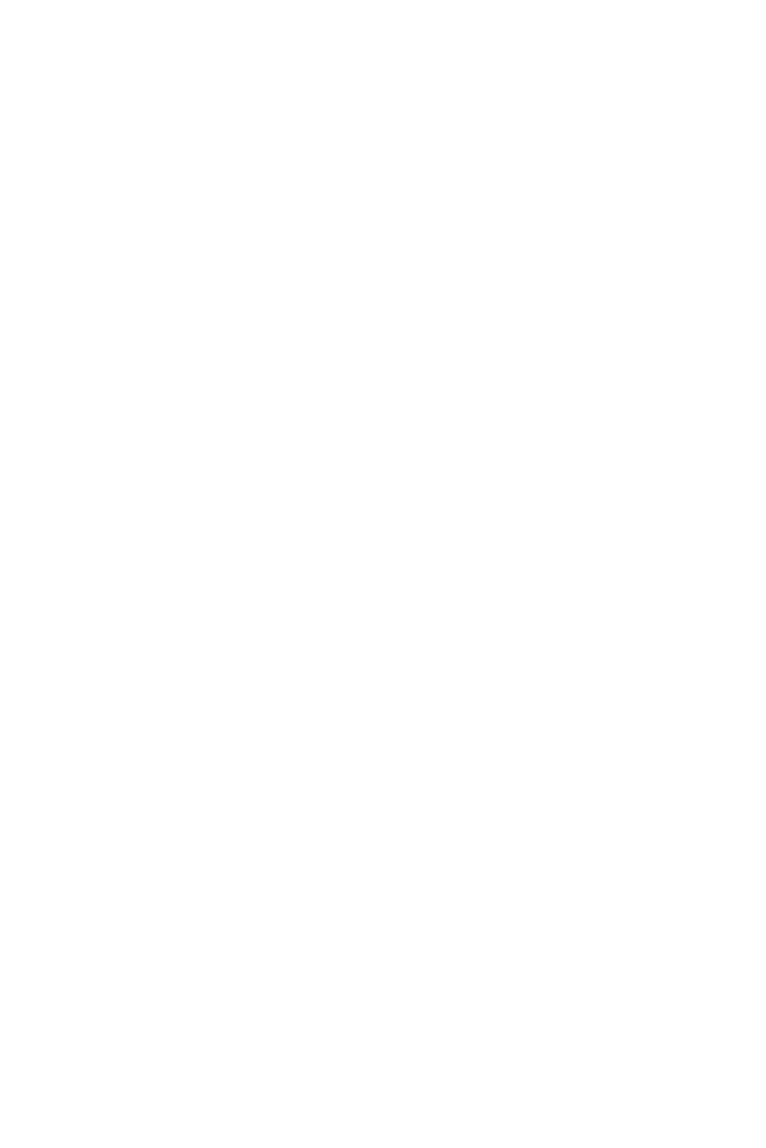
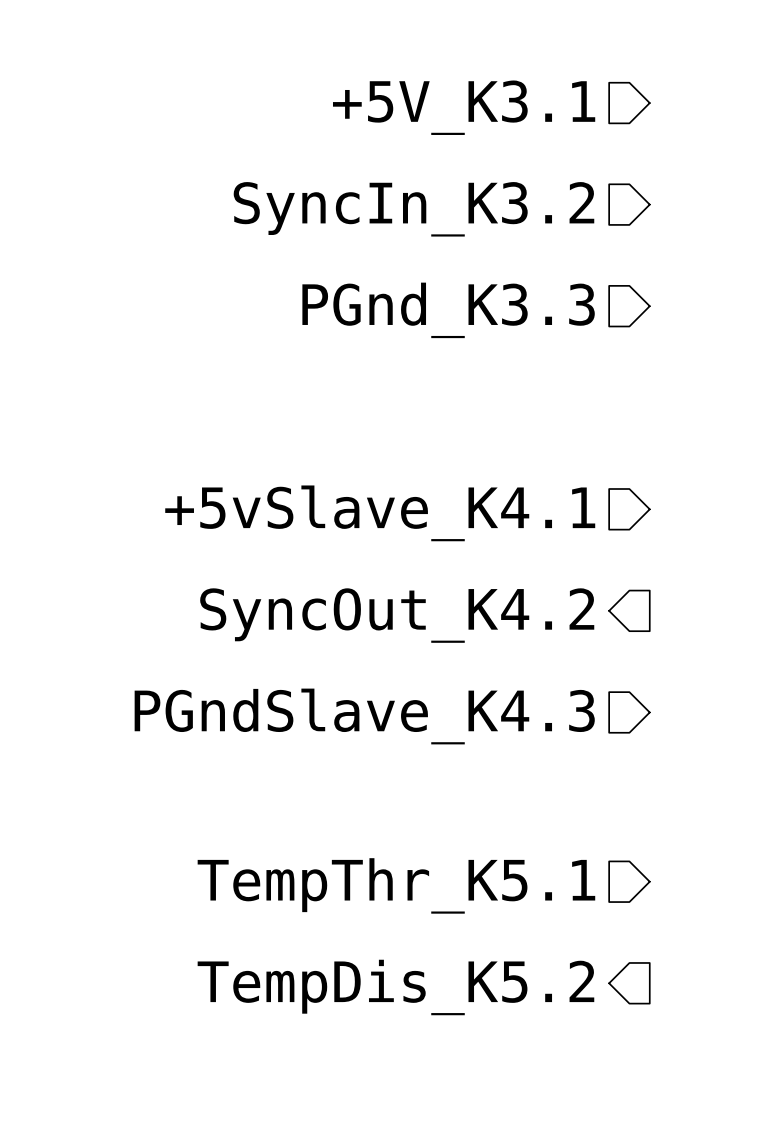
hierarchical label: none -> +5V_K3.1 (464, 107)
hierarchical label: none -> SyncIn_K3.2 (413, 209)
hierarchical label: none -> PGnd_K3.3 (448, 310)
hierarchical label: none -> +5vSlave_K4.1 (380, 513)
hierarchical label: none -> SyncOut_K4.2 (397, 615)
hierarchical label: none -> PGndSlave_K4.3 (364, 716)
hierarchical label: none -> TempThr_K5.1 (396, 885)
hierarchical label: none -> TempDis_K5.2 (395, 987)

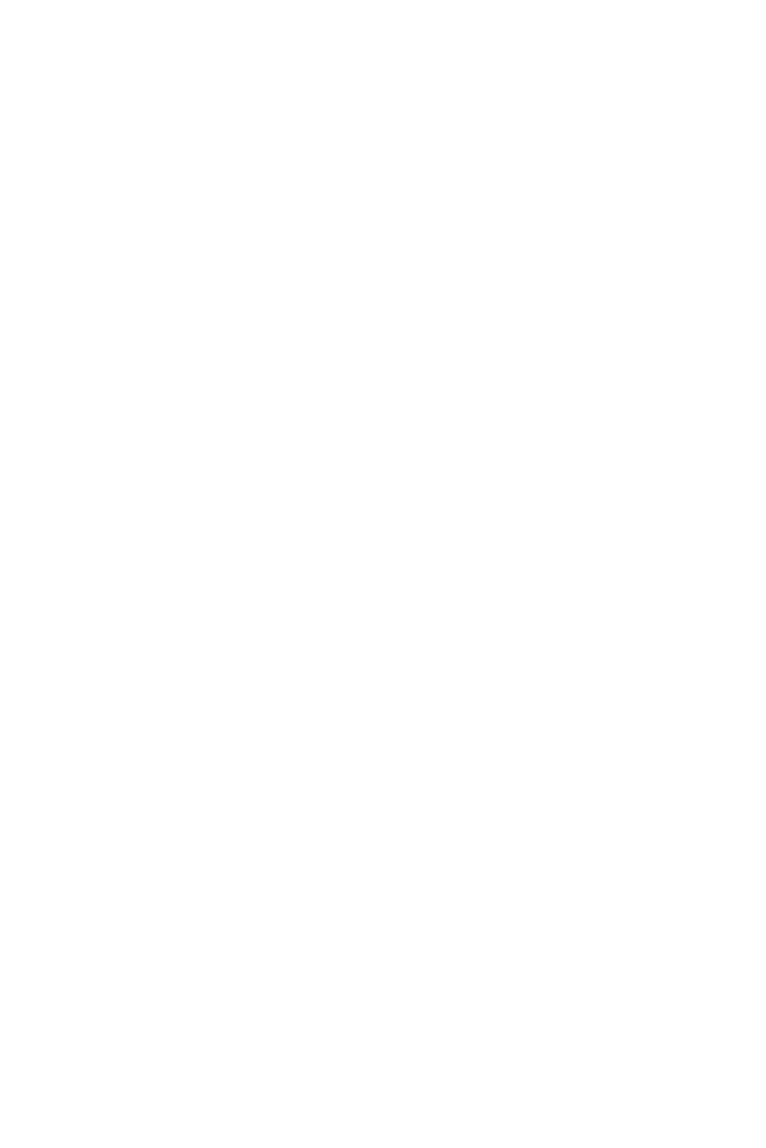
hierarchical label: +5V_K3.1 (464, 107) -> none
hierarchical label: SyncIn_K3.2 (413, 209) -> none
hierarchical label: PGnd_K3.3 (448, 310) -> none
hierarchical label: +5vSlave_K4.1 (380, 513) -> none
hierarchical label: SyncOut_K4.2 (397, 615) -> none
hierarchical label: PGndSlave_K4.3 (364, 716) -> none
hierarchical label: TempThr_K5.1 (396, 885) -> none
hierarchical label: TempDis_K5.2 (395, 987) -> none

